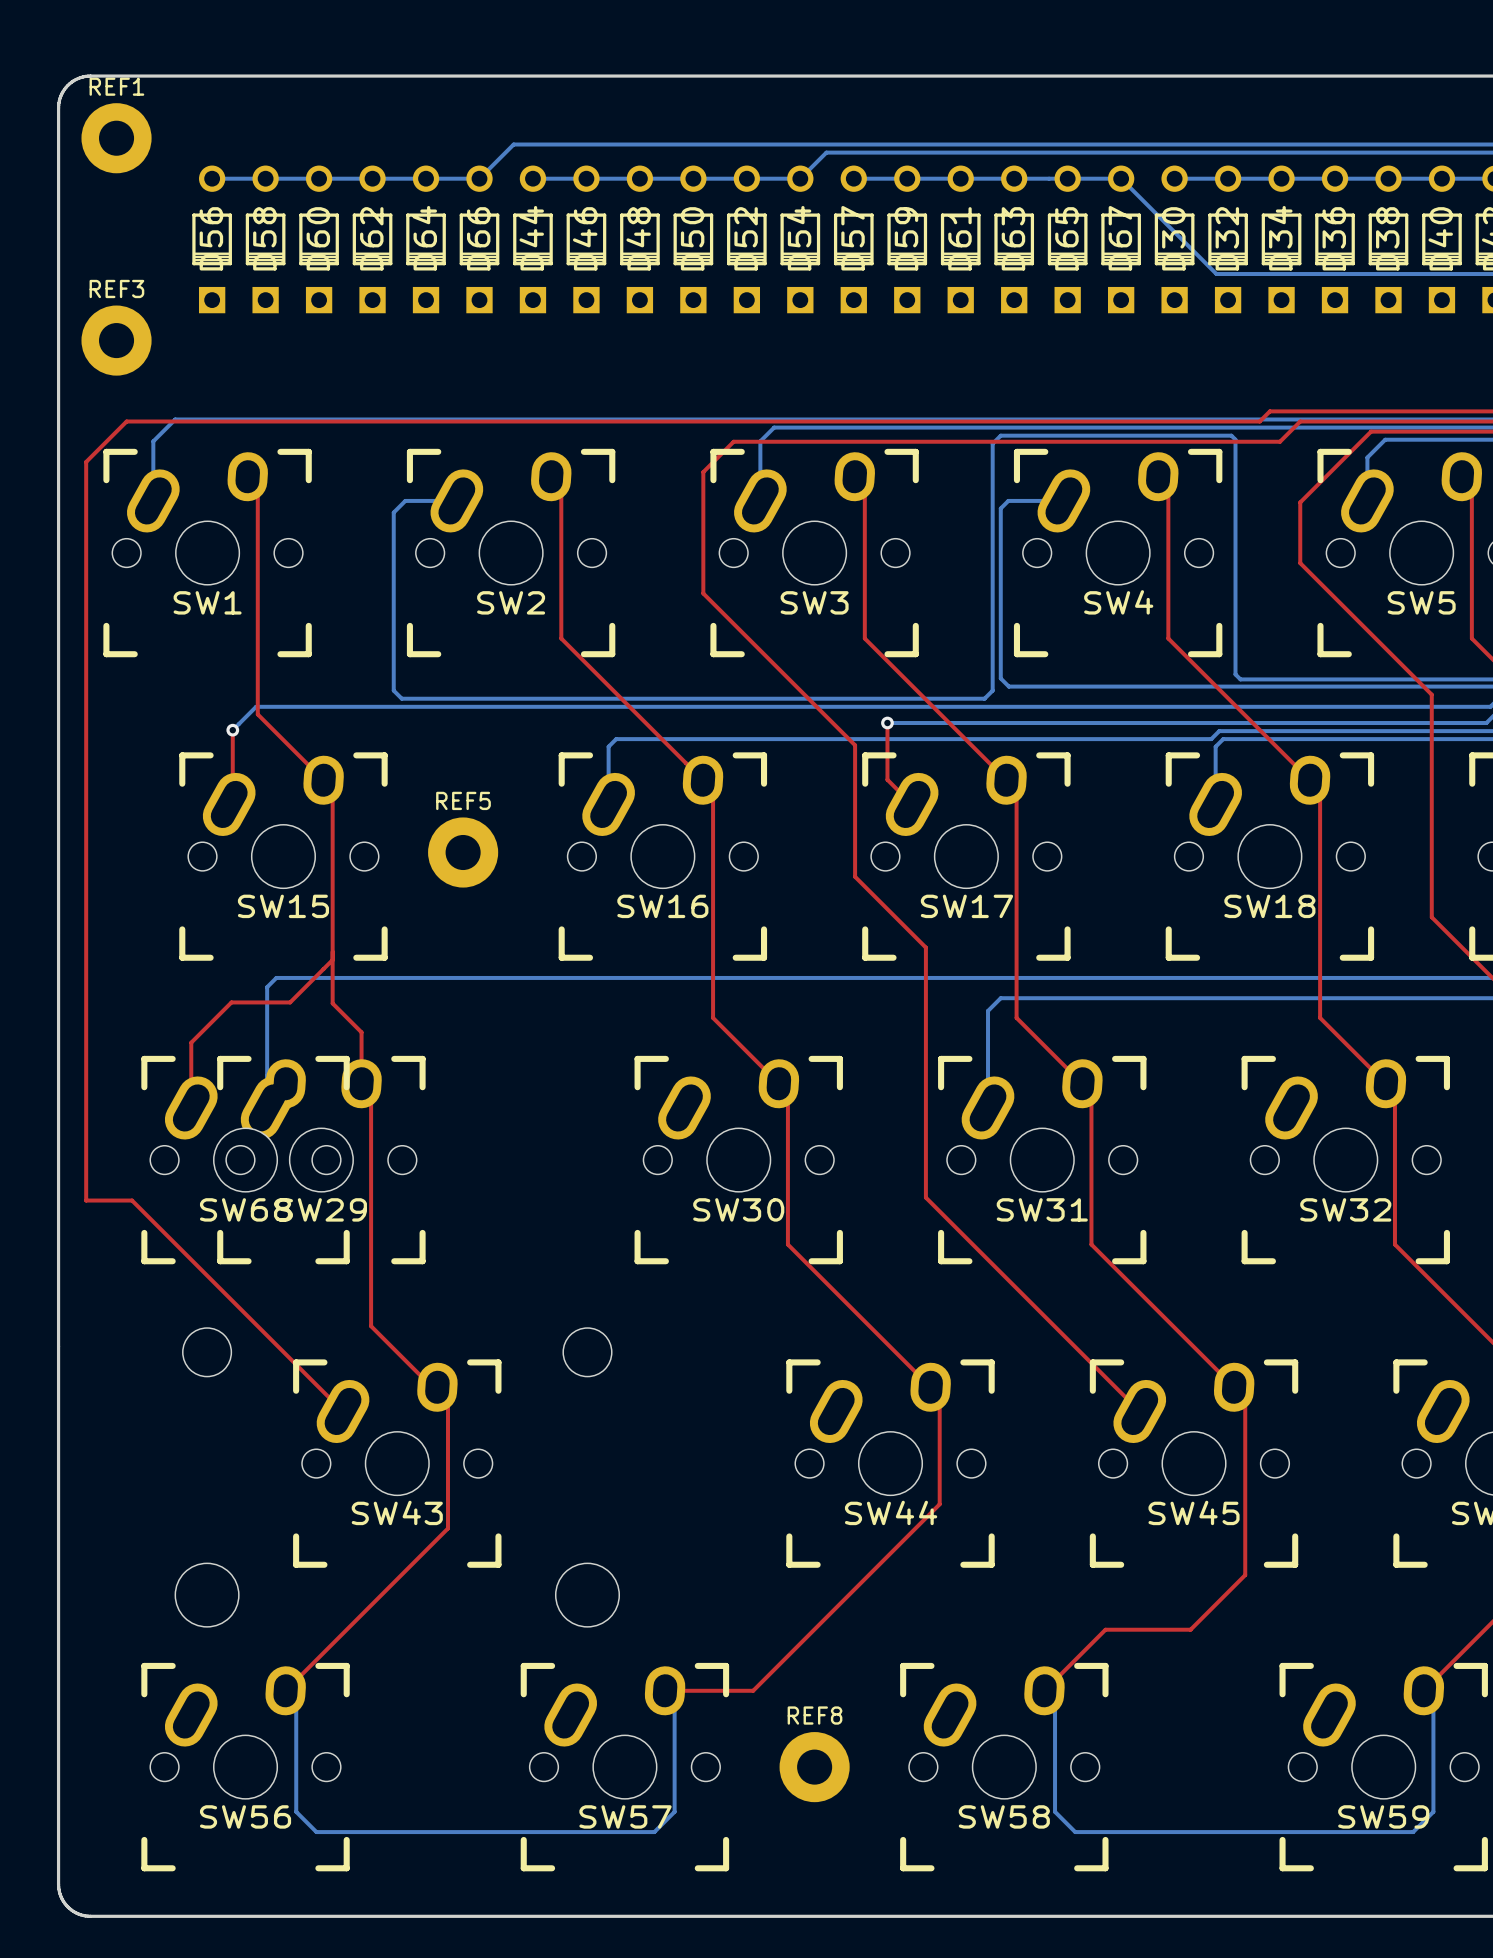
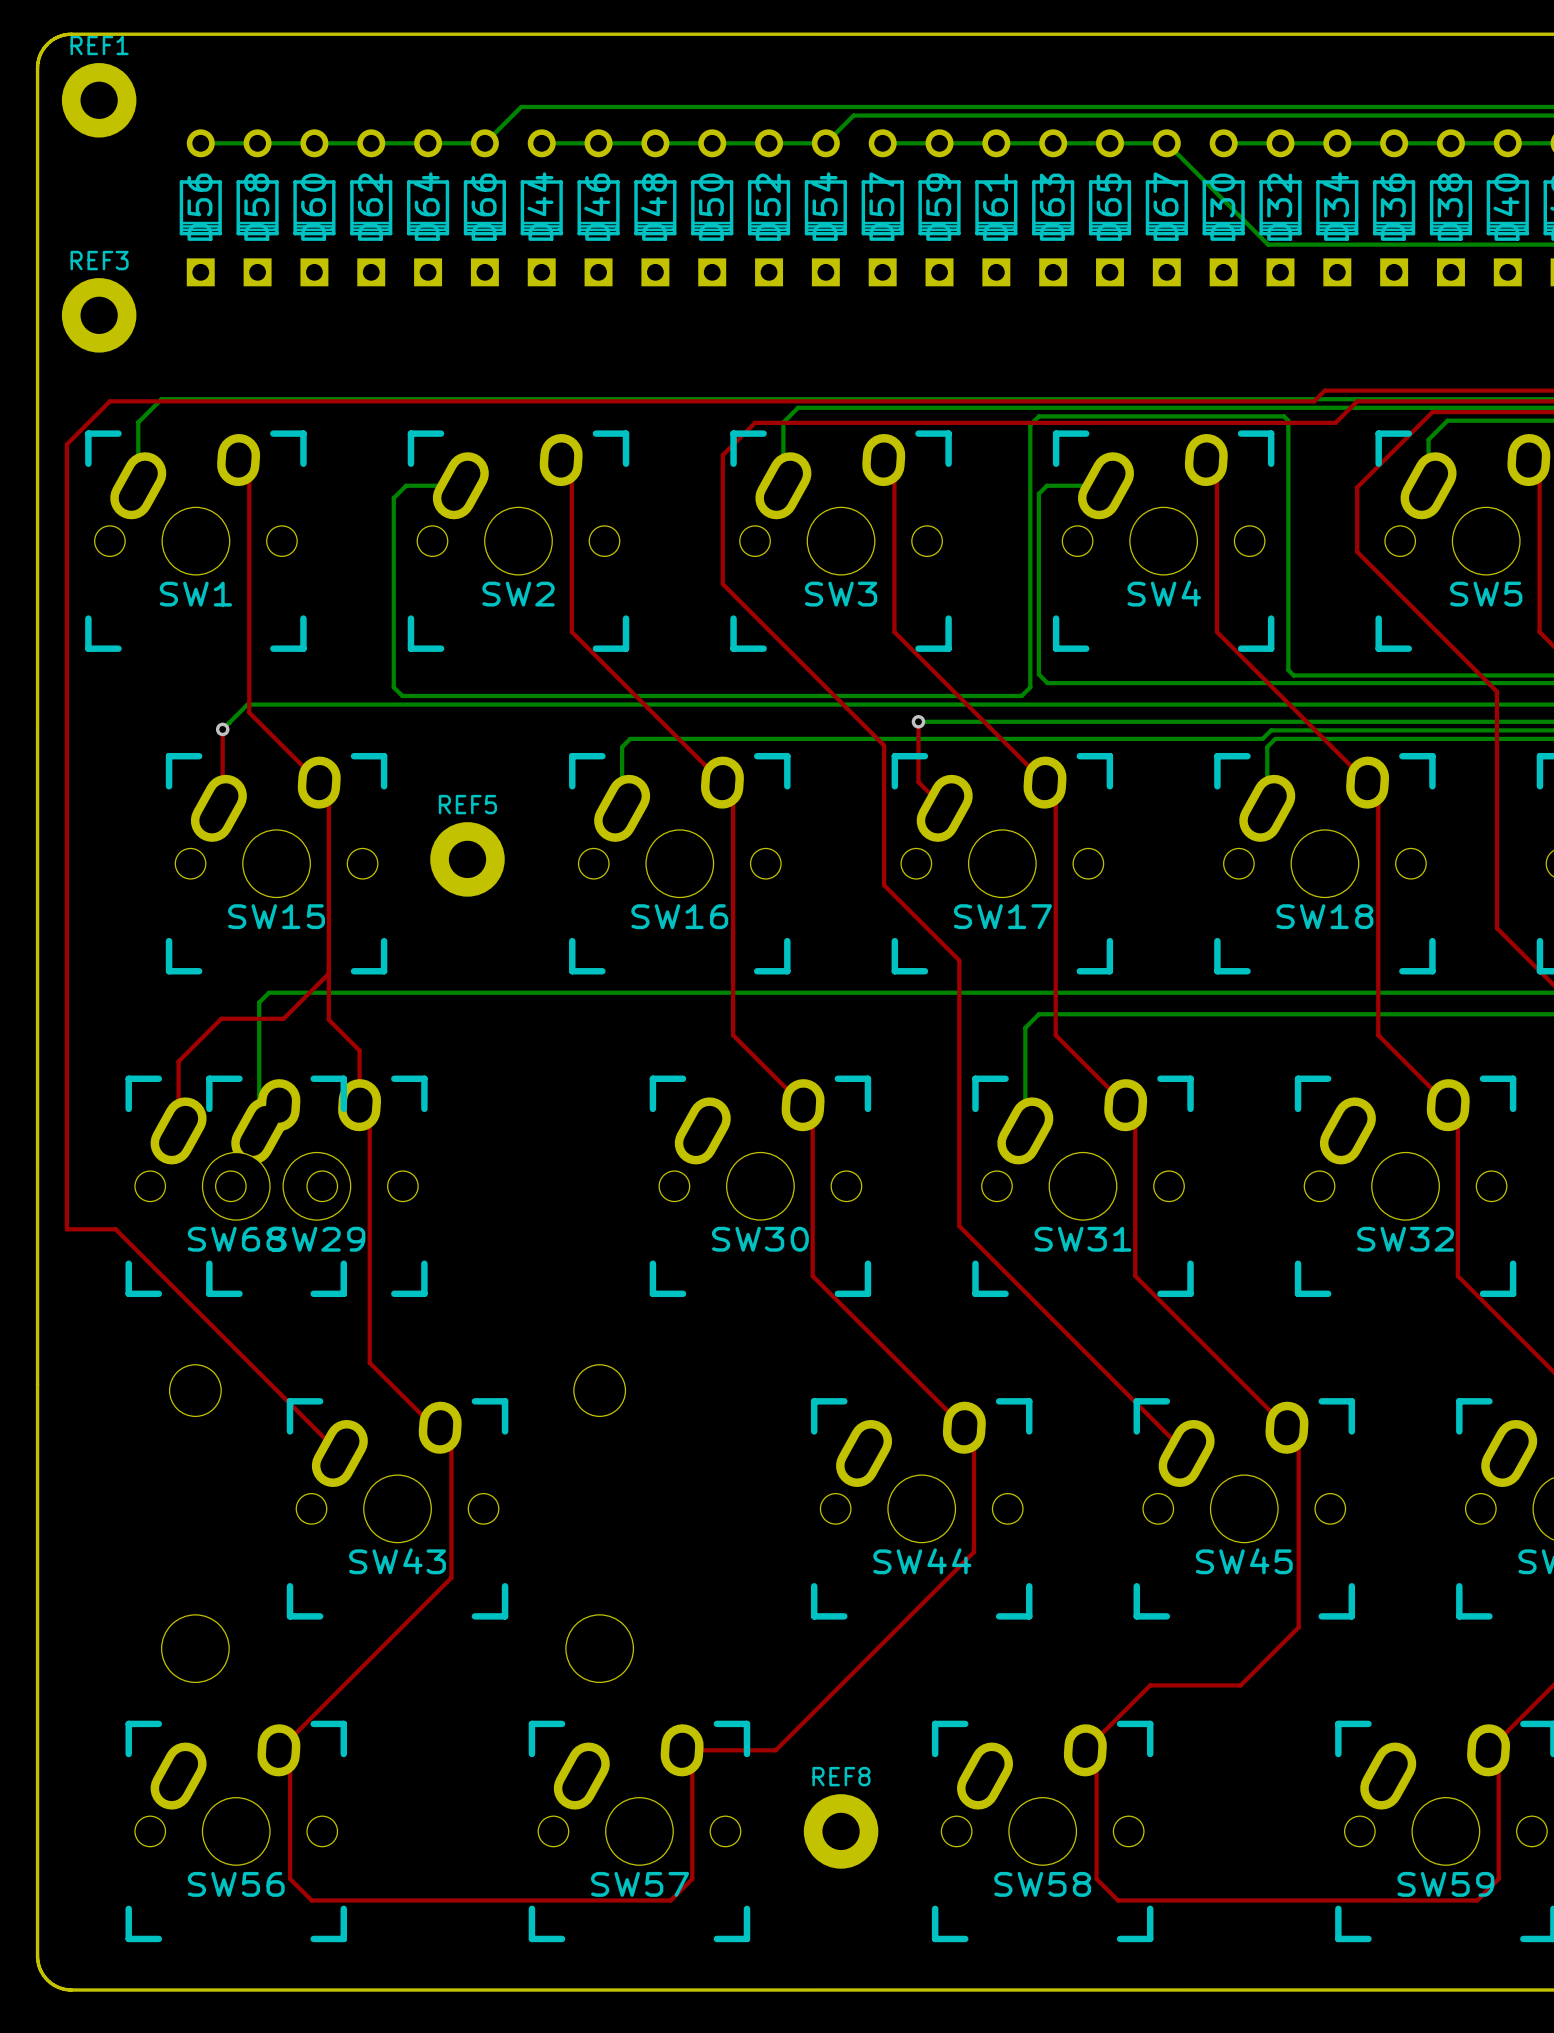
bottom track: (285, 1690) (296, 1701) (296, 1811) (316, 1832) (654, 1832) (674, 1811) (674, 1700) (665, 1690) -> none
top track: none -> (278, 1750) (290, 1761) (290, 1878) (311, 1900) (670, 1900) (692, 1878) (692, 1760) (682, 1750)
bottom track: (1044, 1690) (1055, 1701) (1055, 1811) (1075, 1832) (1413, 1832) (1433, 1811) (1433, 1700) (1423, 1690) -> none
top track: none -> (1085, 1750) (1096, 1761) (1096, 1878) (1118, 1900) (1477, 1900) (1498, 1878) (1498, 1760) (1488, 1750)

